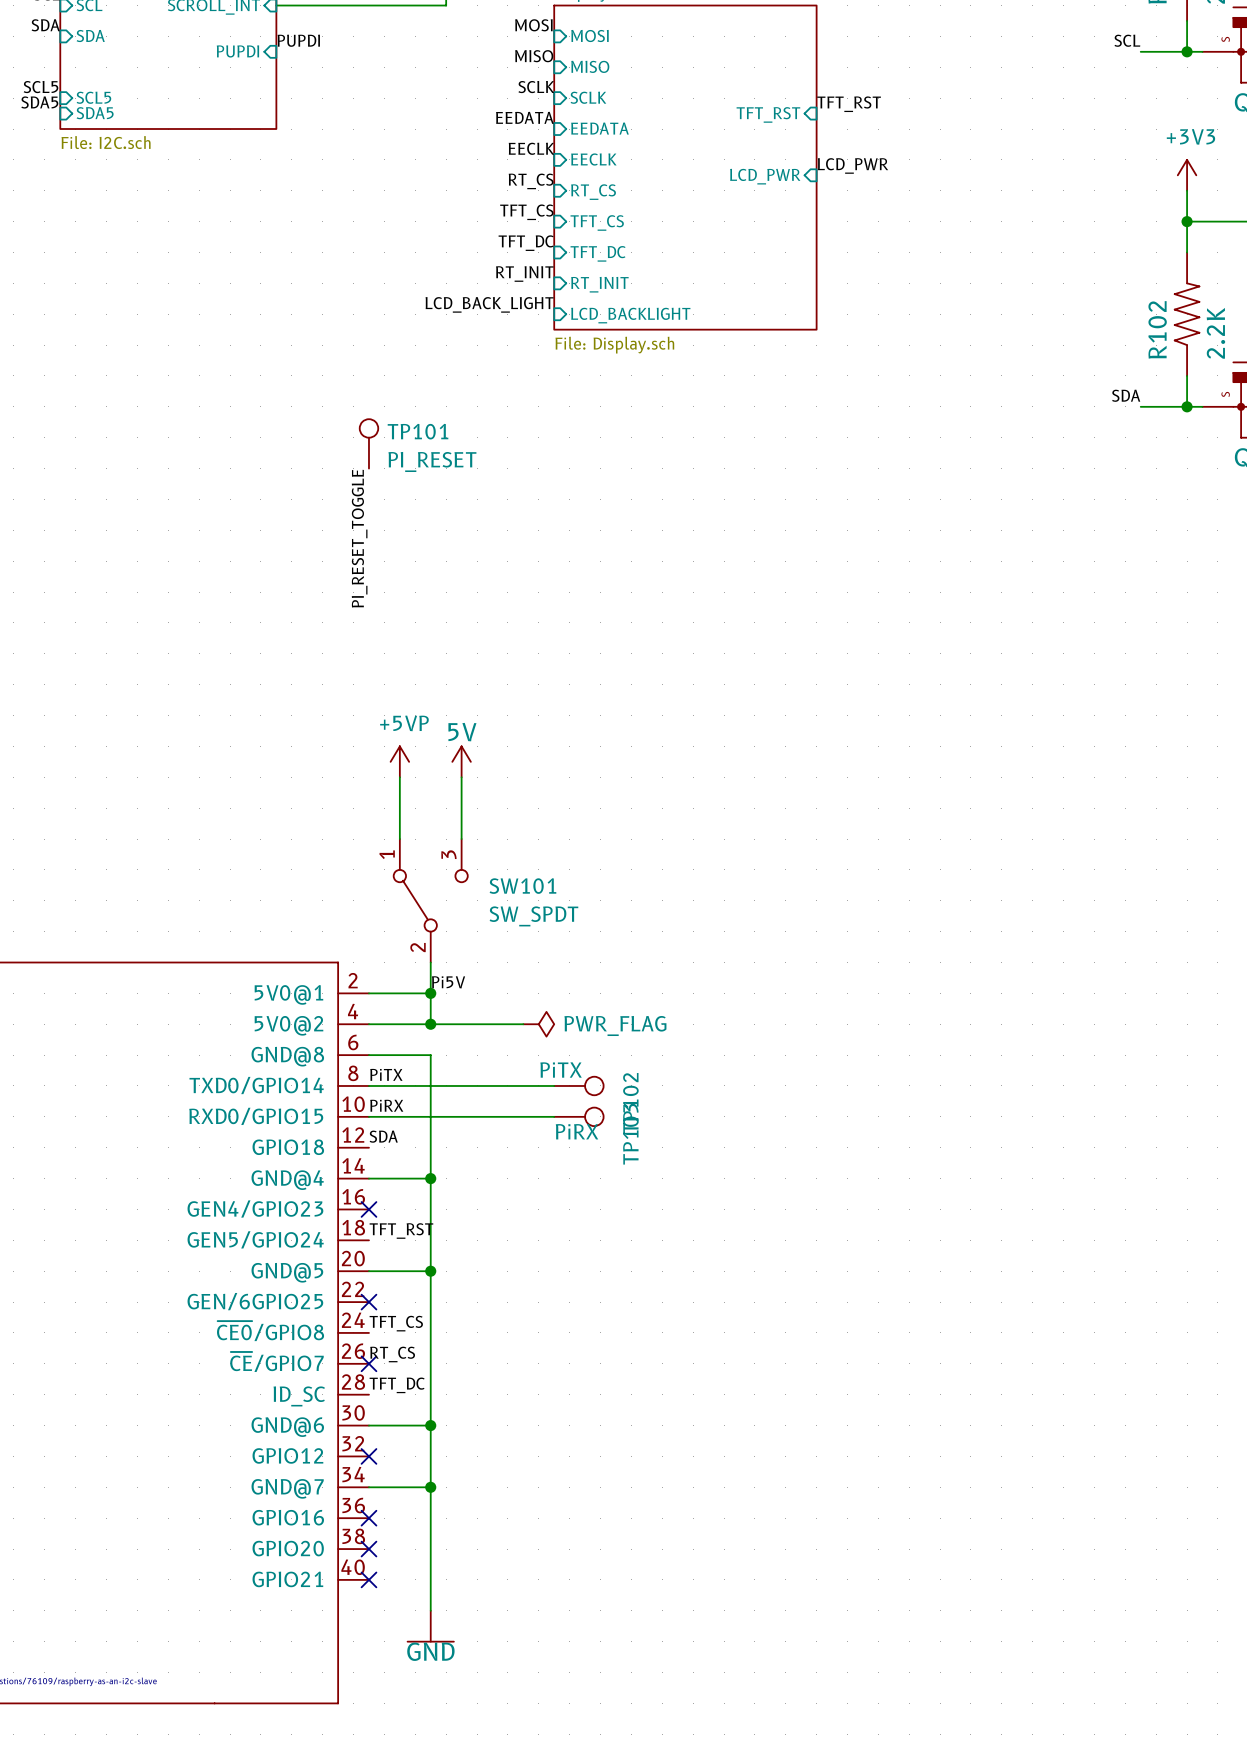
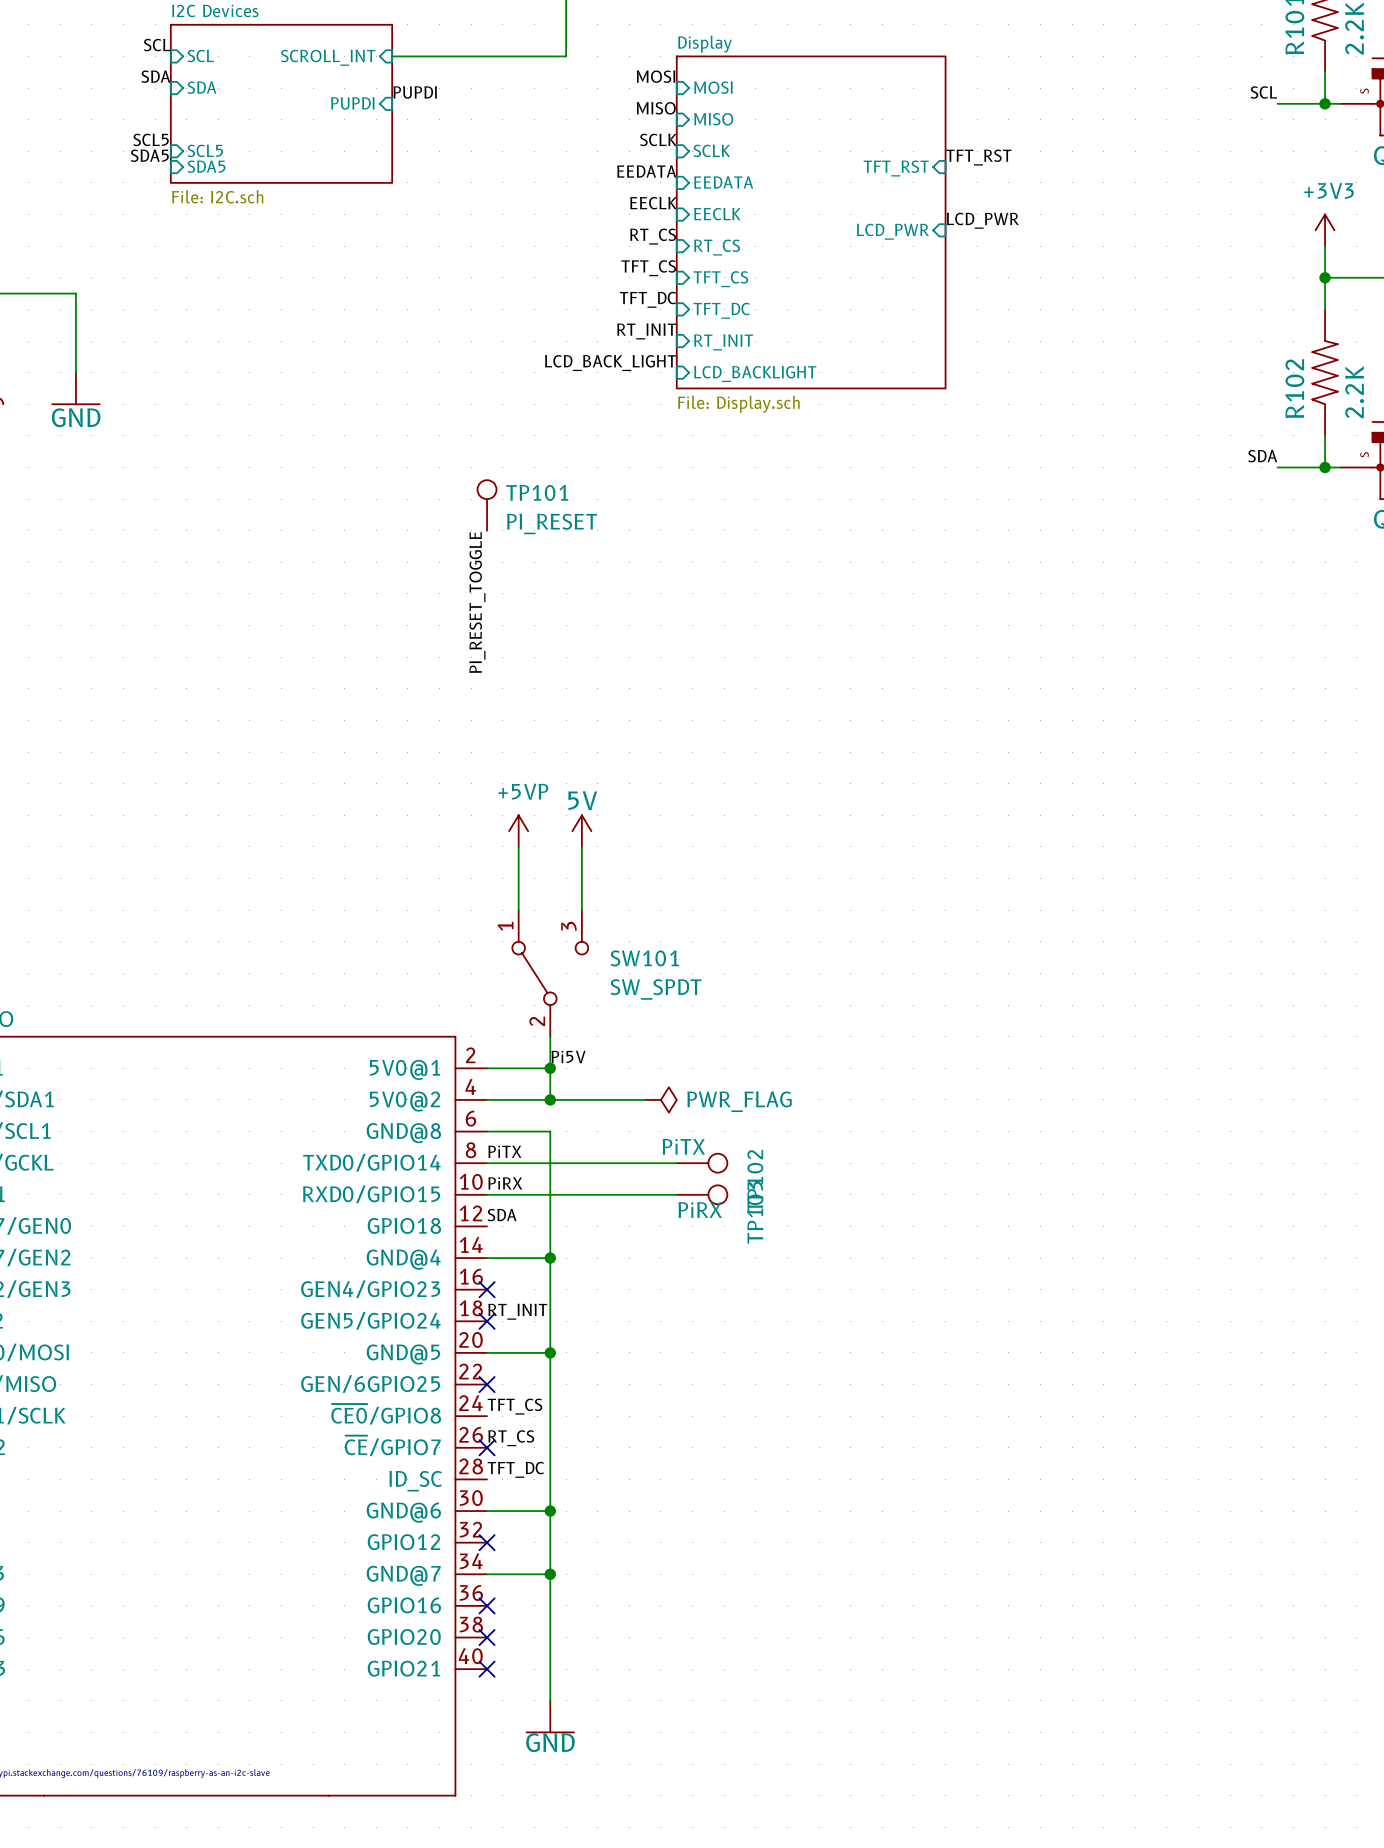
label: TFT_RST (401, 1231) -> RT_INIT (517, 1311)
no-connect mark: none -> (487, 1321)

